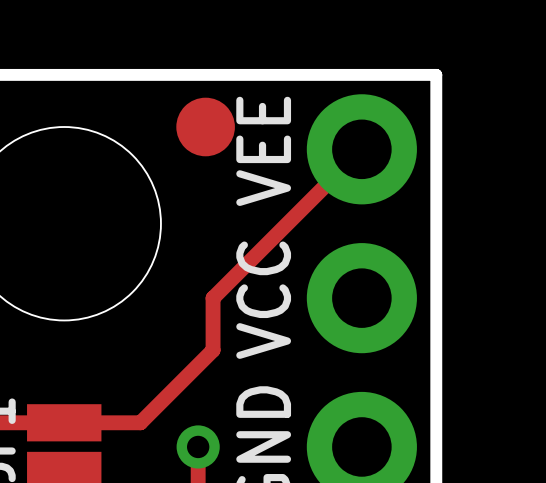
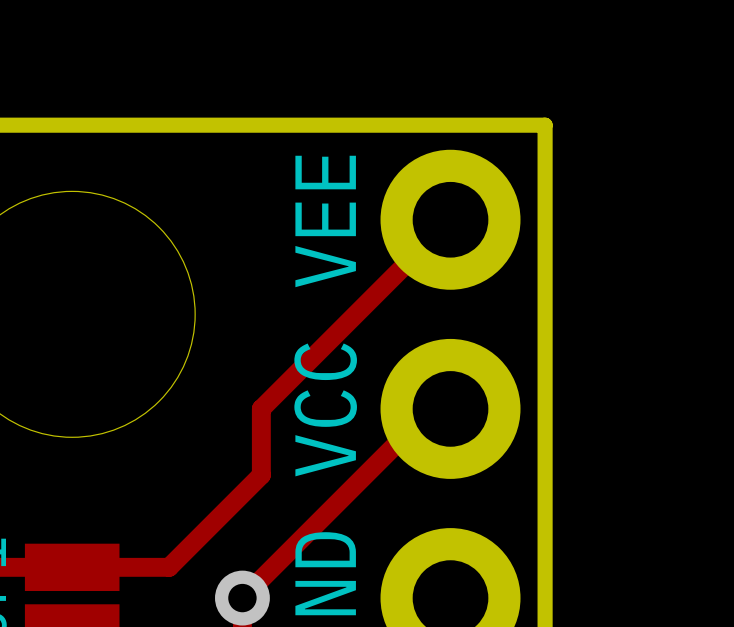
part: (205, 126) -> none
track: none -> (450, 408) (431, 408) (242, 598)

